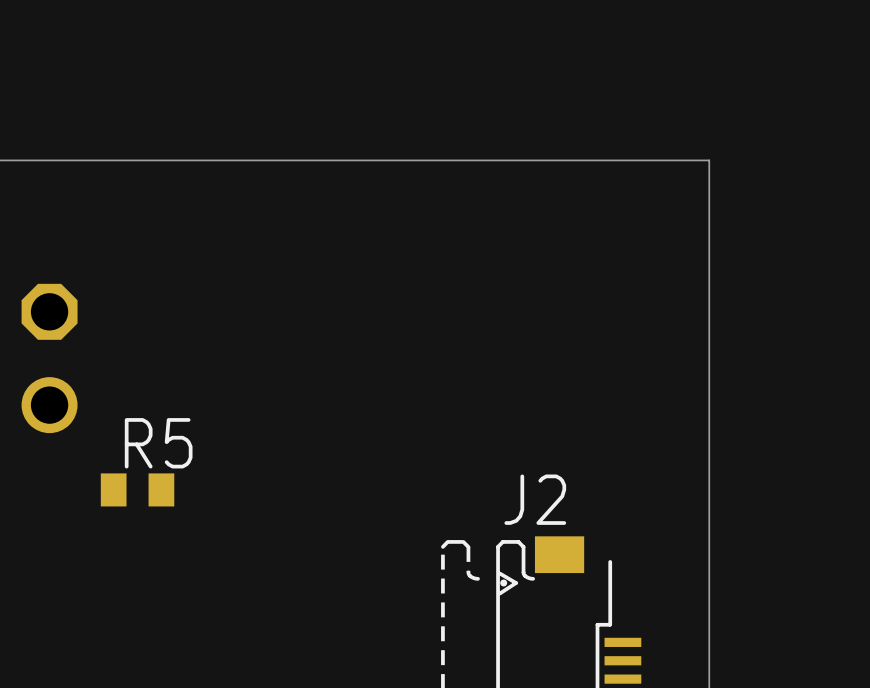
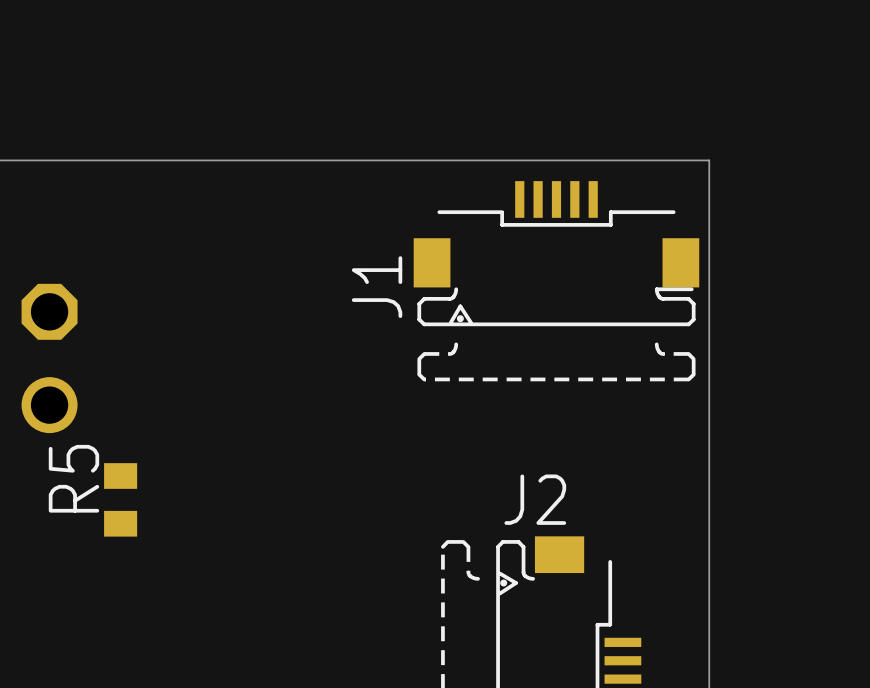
J1: none -> (556, 281)
R5 name position: R5 (158, 443) -> R5 (73, 478)
R5 rotation: 0° (137, 489) -> 90° clockwise (120, 499)

